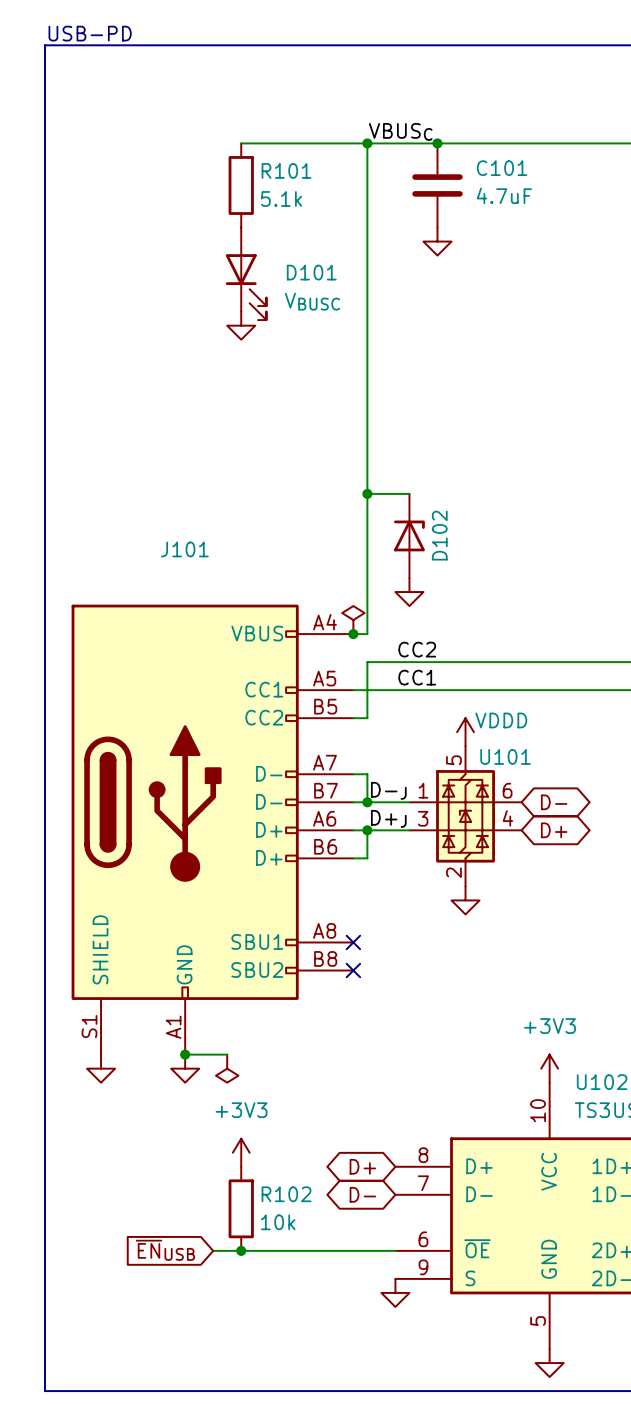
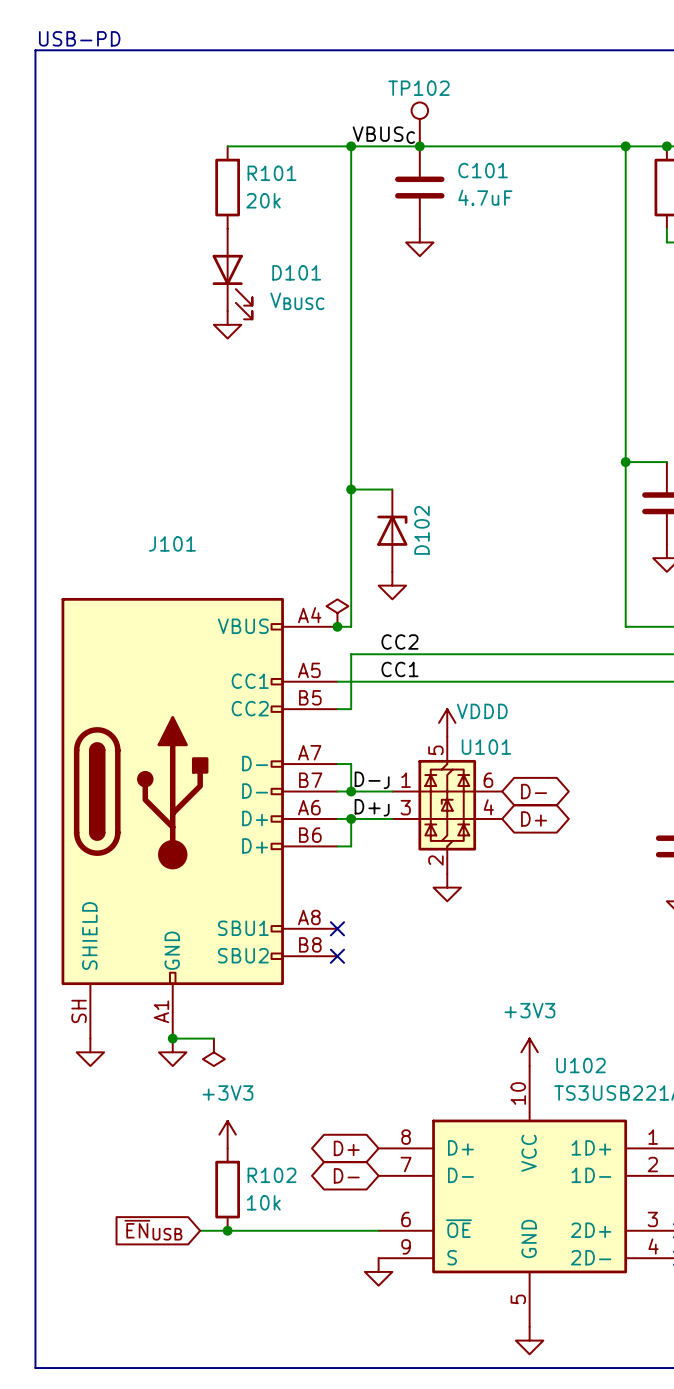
TP102: none -> (419, 124)
R101 value: 5.1k (281, 198) -> 20k (263, 200)
J101 pin number: S1 (89, 1026) -> SH (79, 1011)

